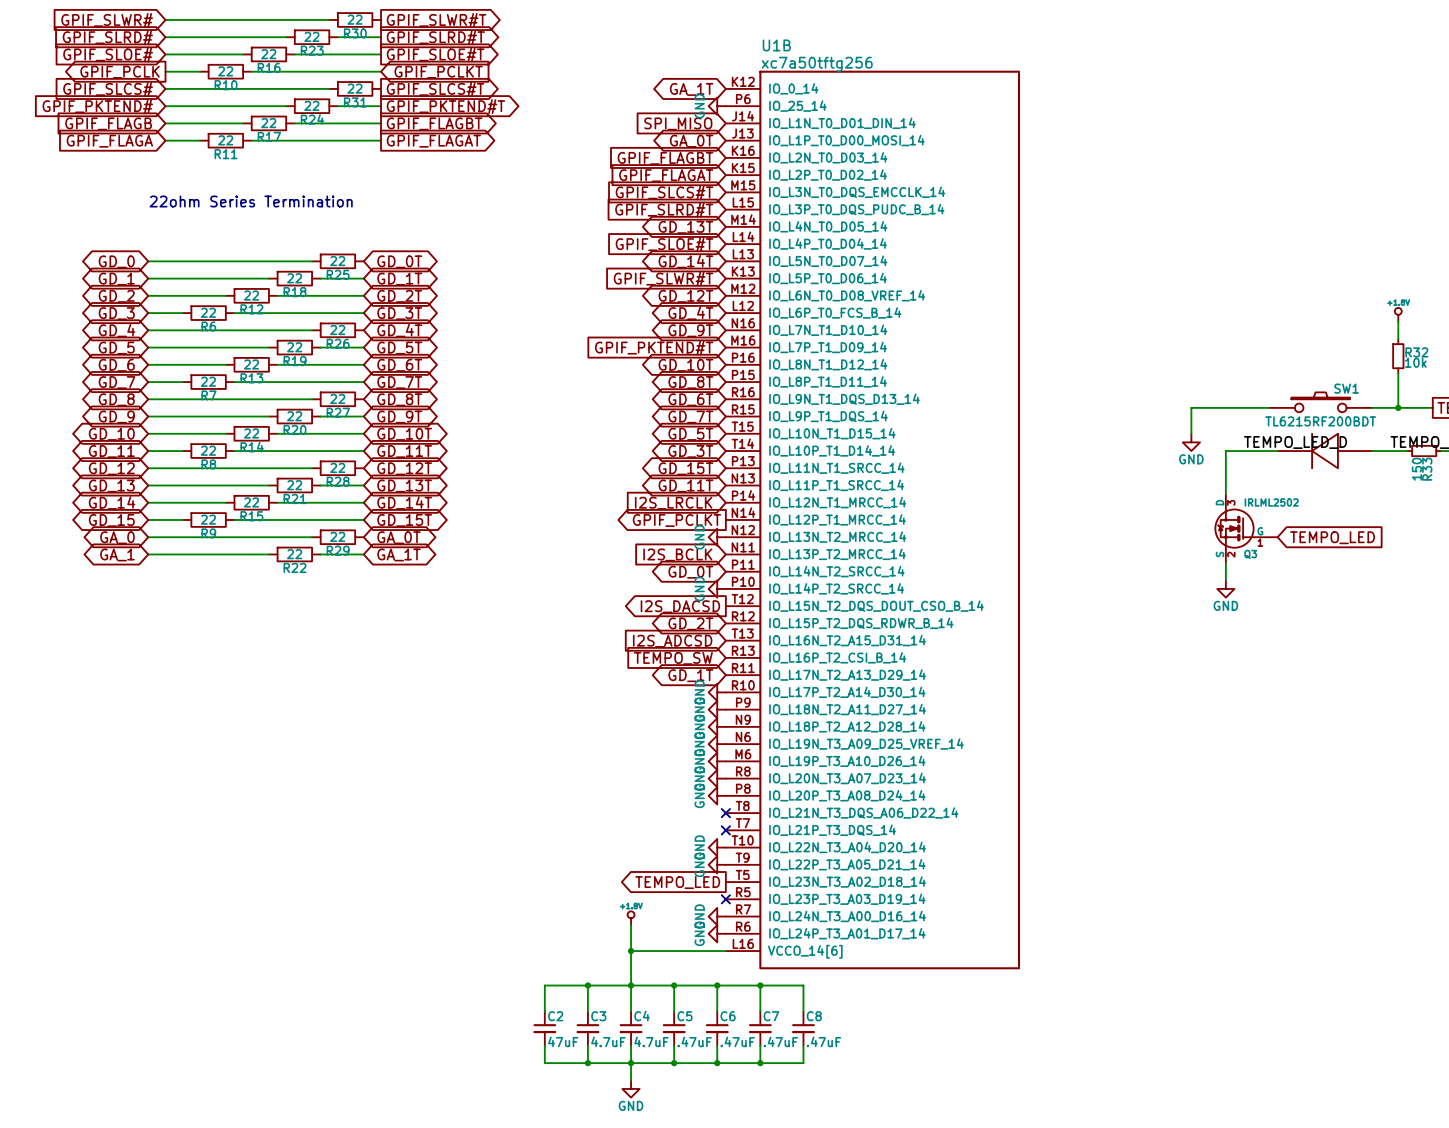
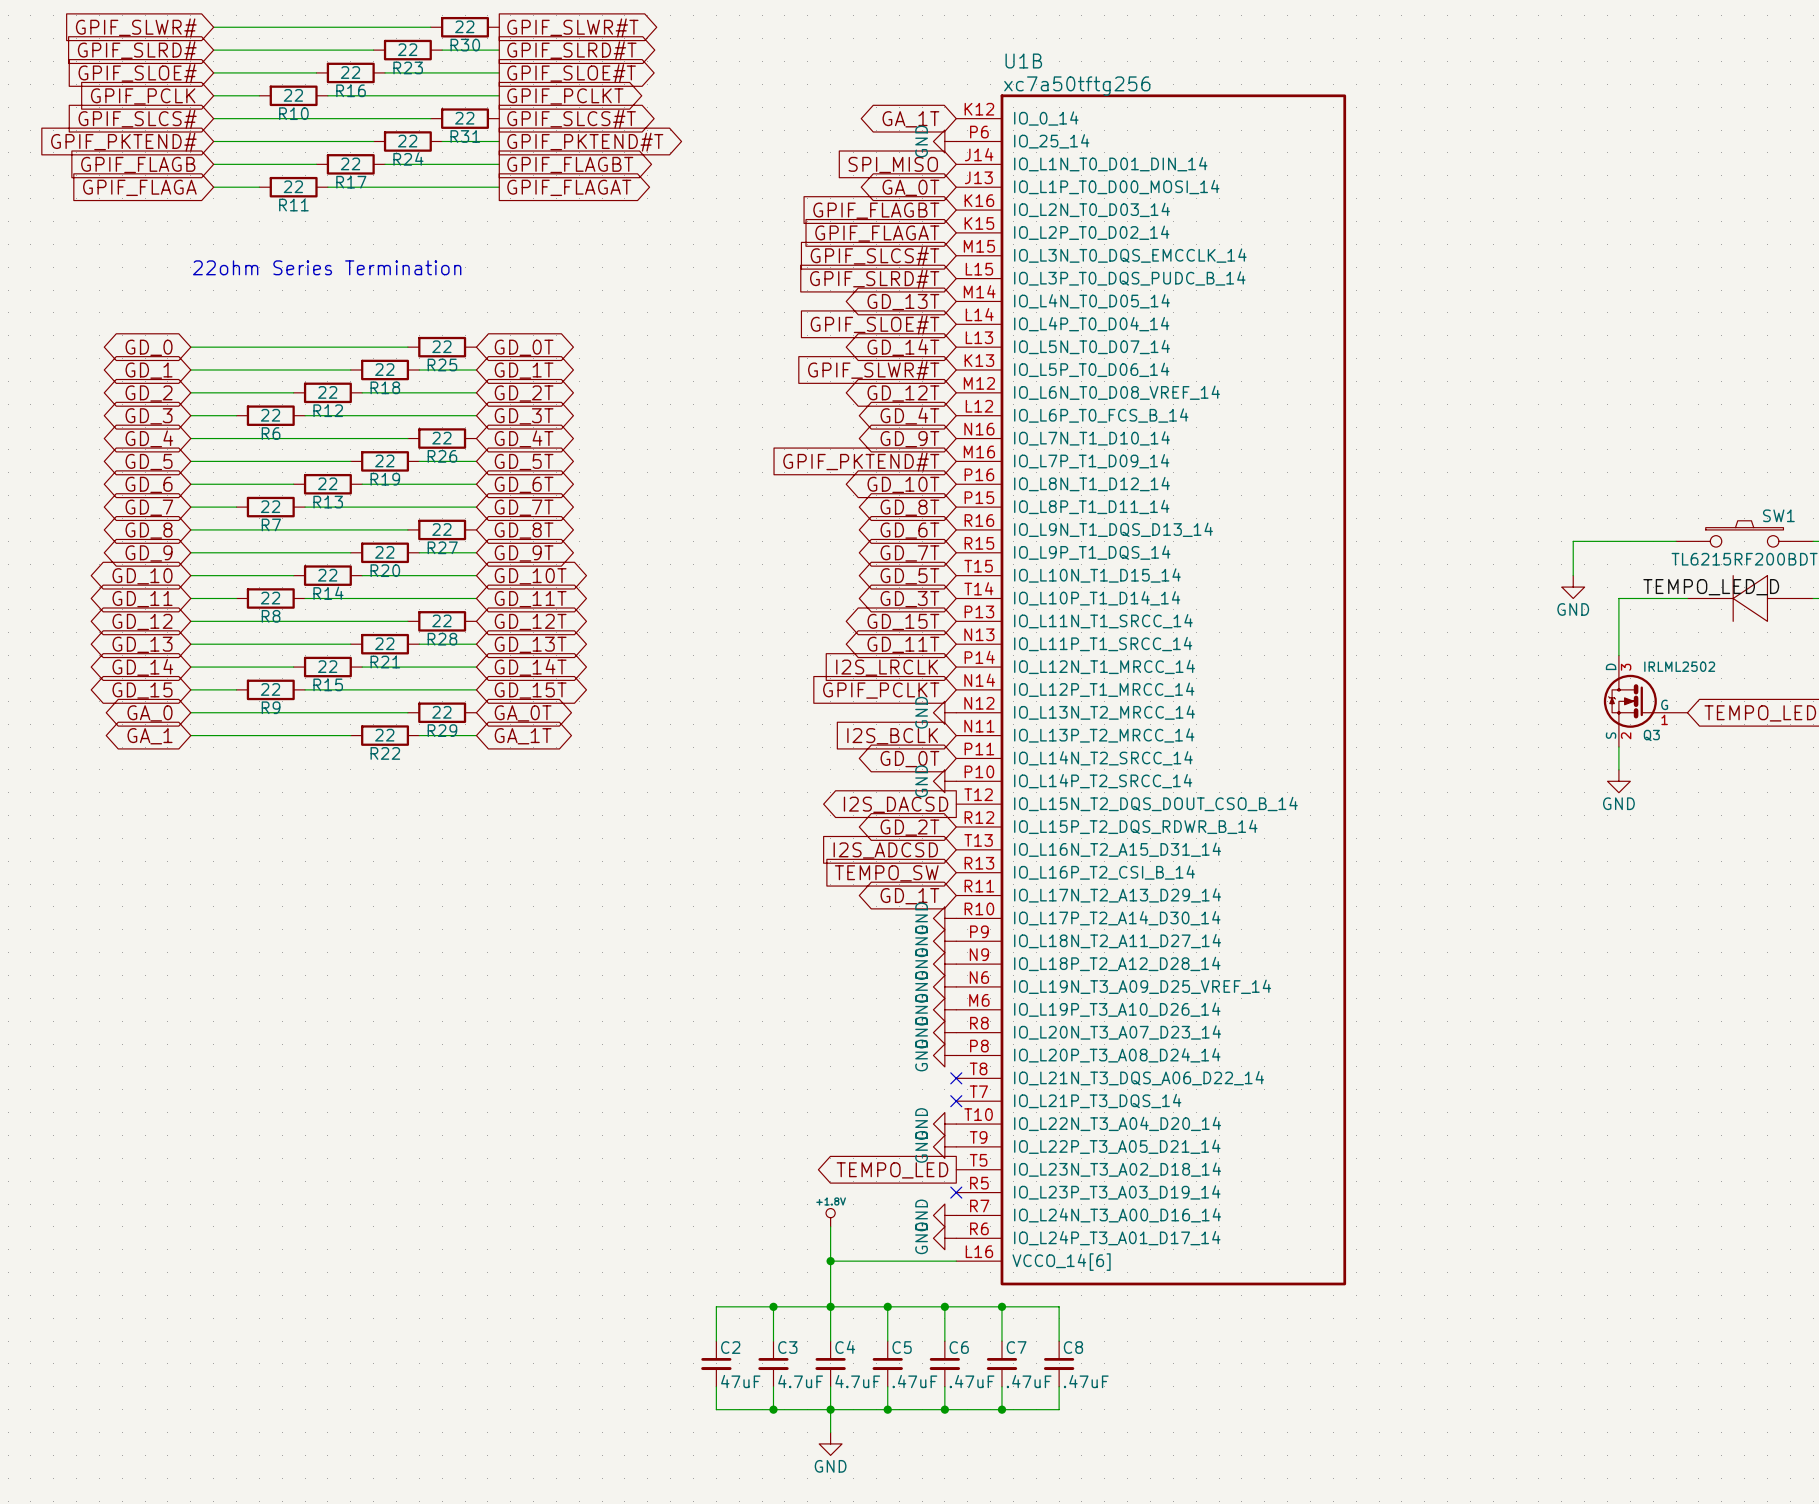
global label shape: output (120, 72) -> input (143, 96)
global label shape: input (438, 72) -> output (565, 96)
global label shape: output (676, 520) -> input (881, 690)

